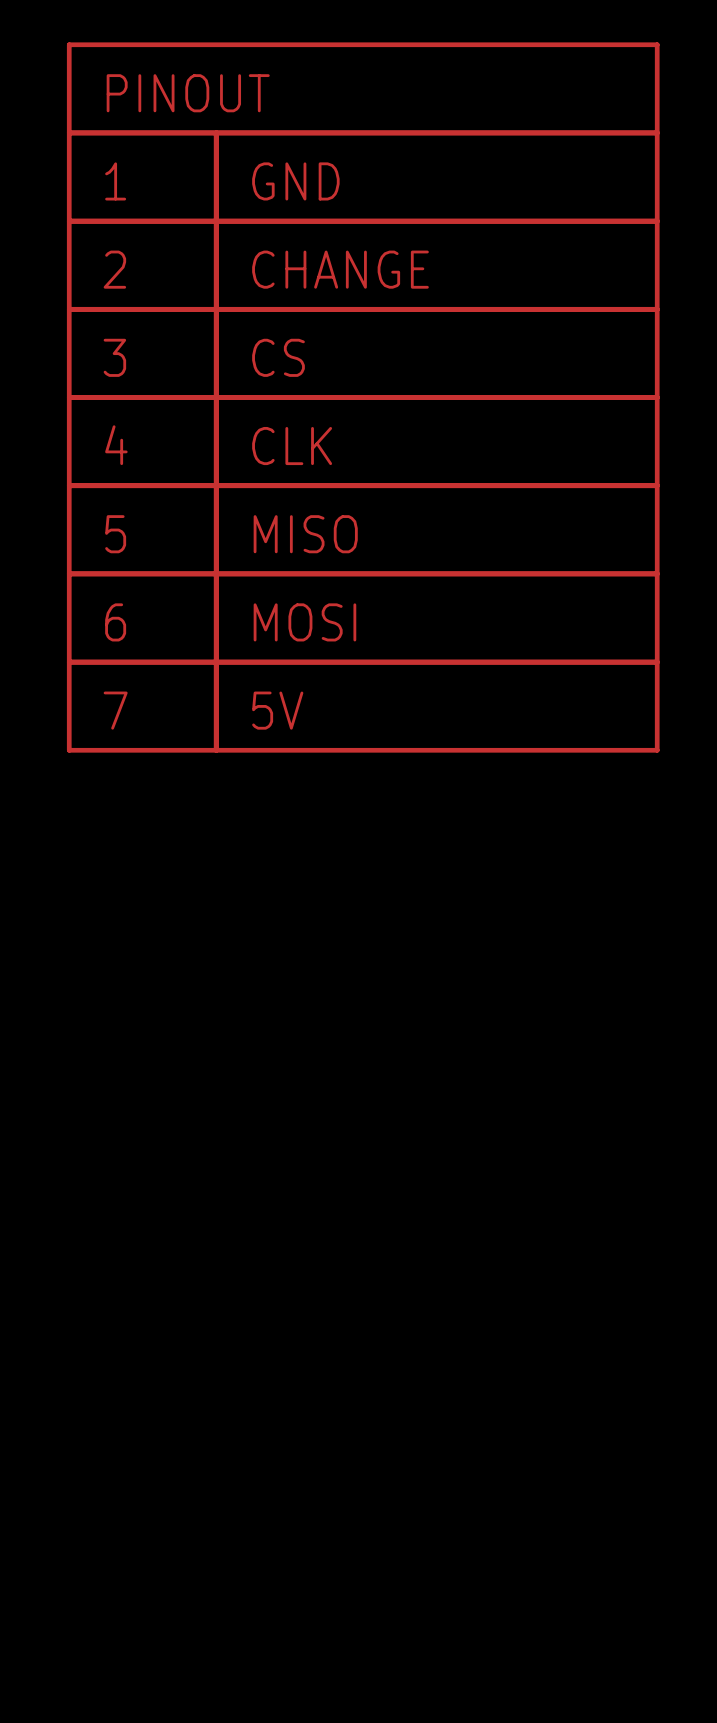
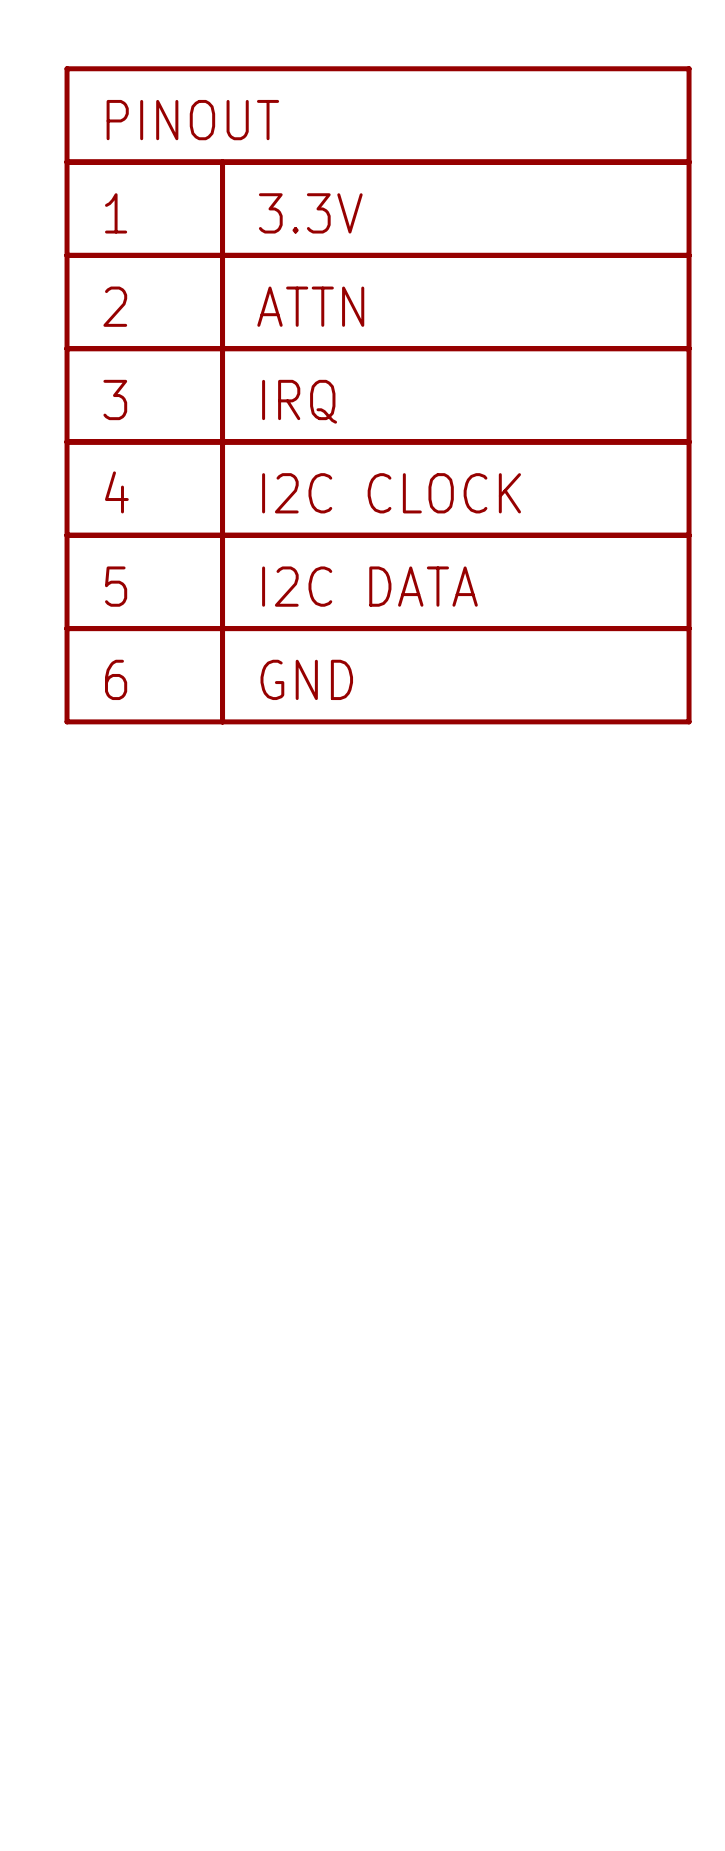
part value: GND (295, 181) -> 3.3V (310, 213)
part value: CHANGE (340, 269) -> ATTN (310, 306)
part value: CS (278, 357) -> IRQ (299, 401)
part value: CLK (292, 446) -> I2C CLOCK (391, 493)
part value: MISO (305, 534) -> I2C DATA (369, 586)
part value: MOSI (304, 622) -> GND (306, 679)
part: 7 (142, 706) -> none
part: 5V (436, 706) -> none

